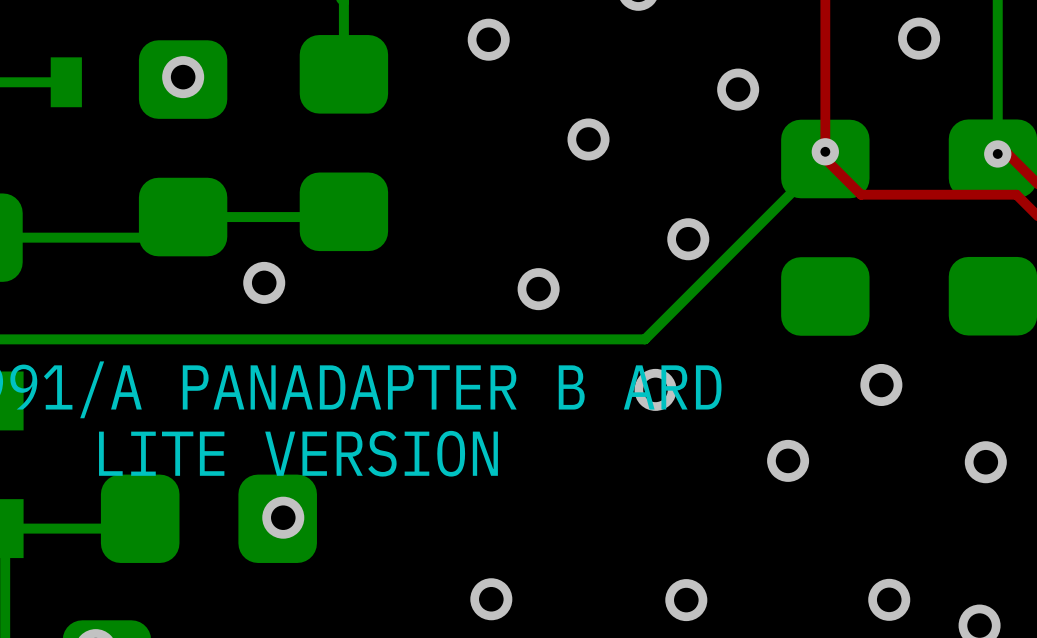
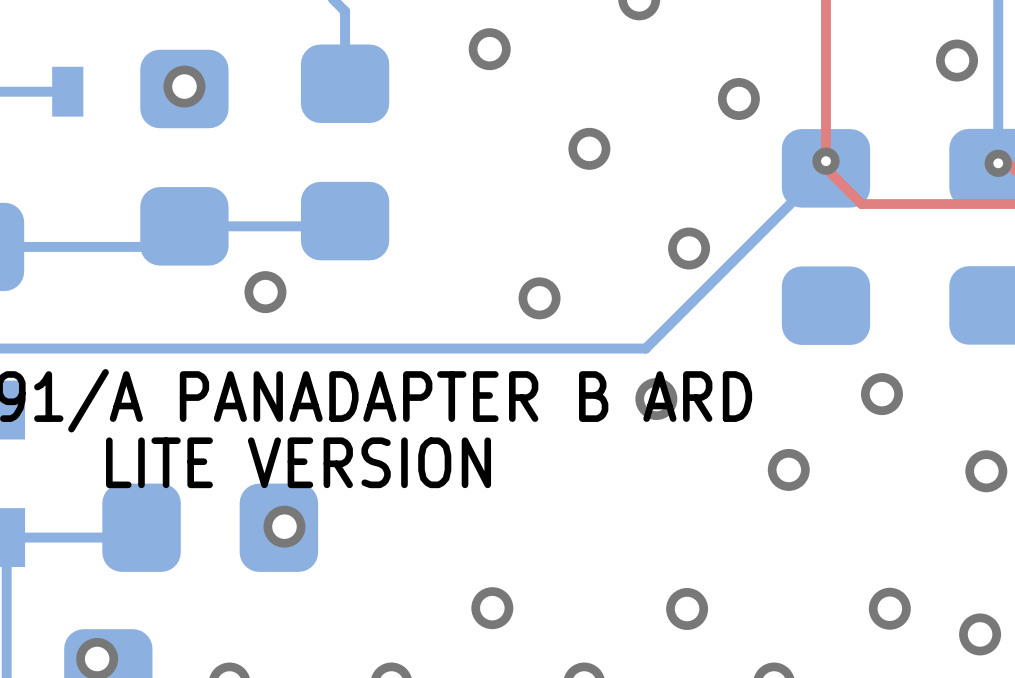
via position: (919, 38) -> (957, 60)

